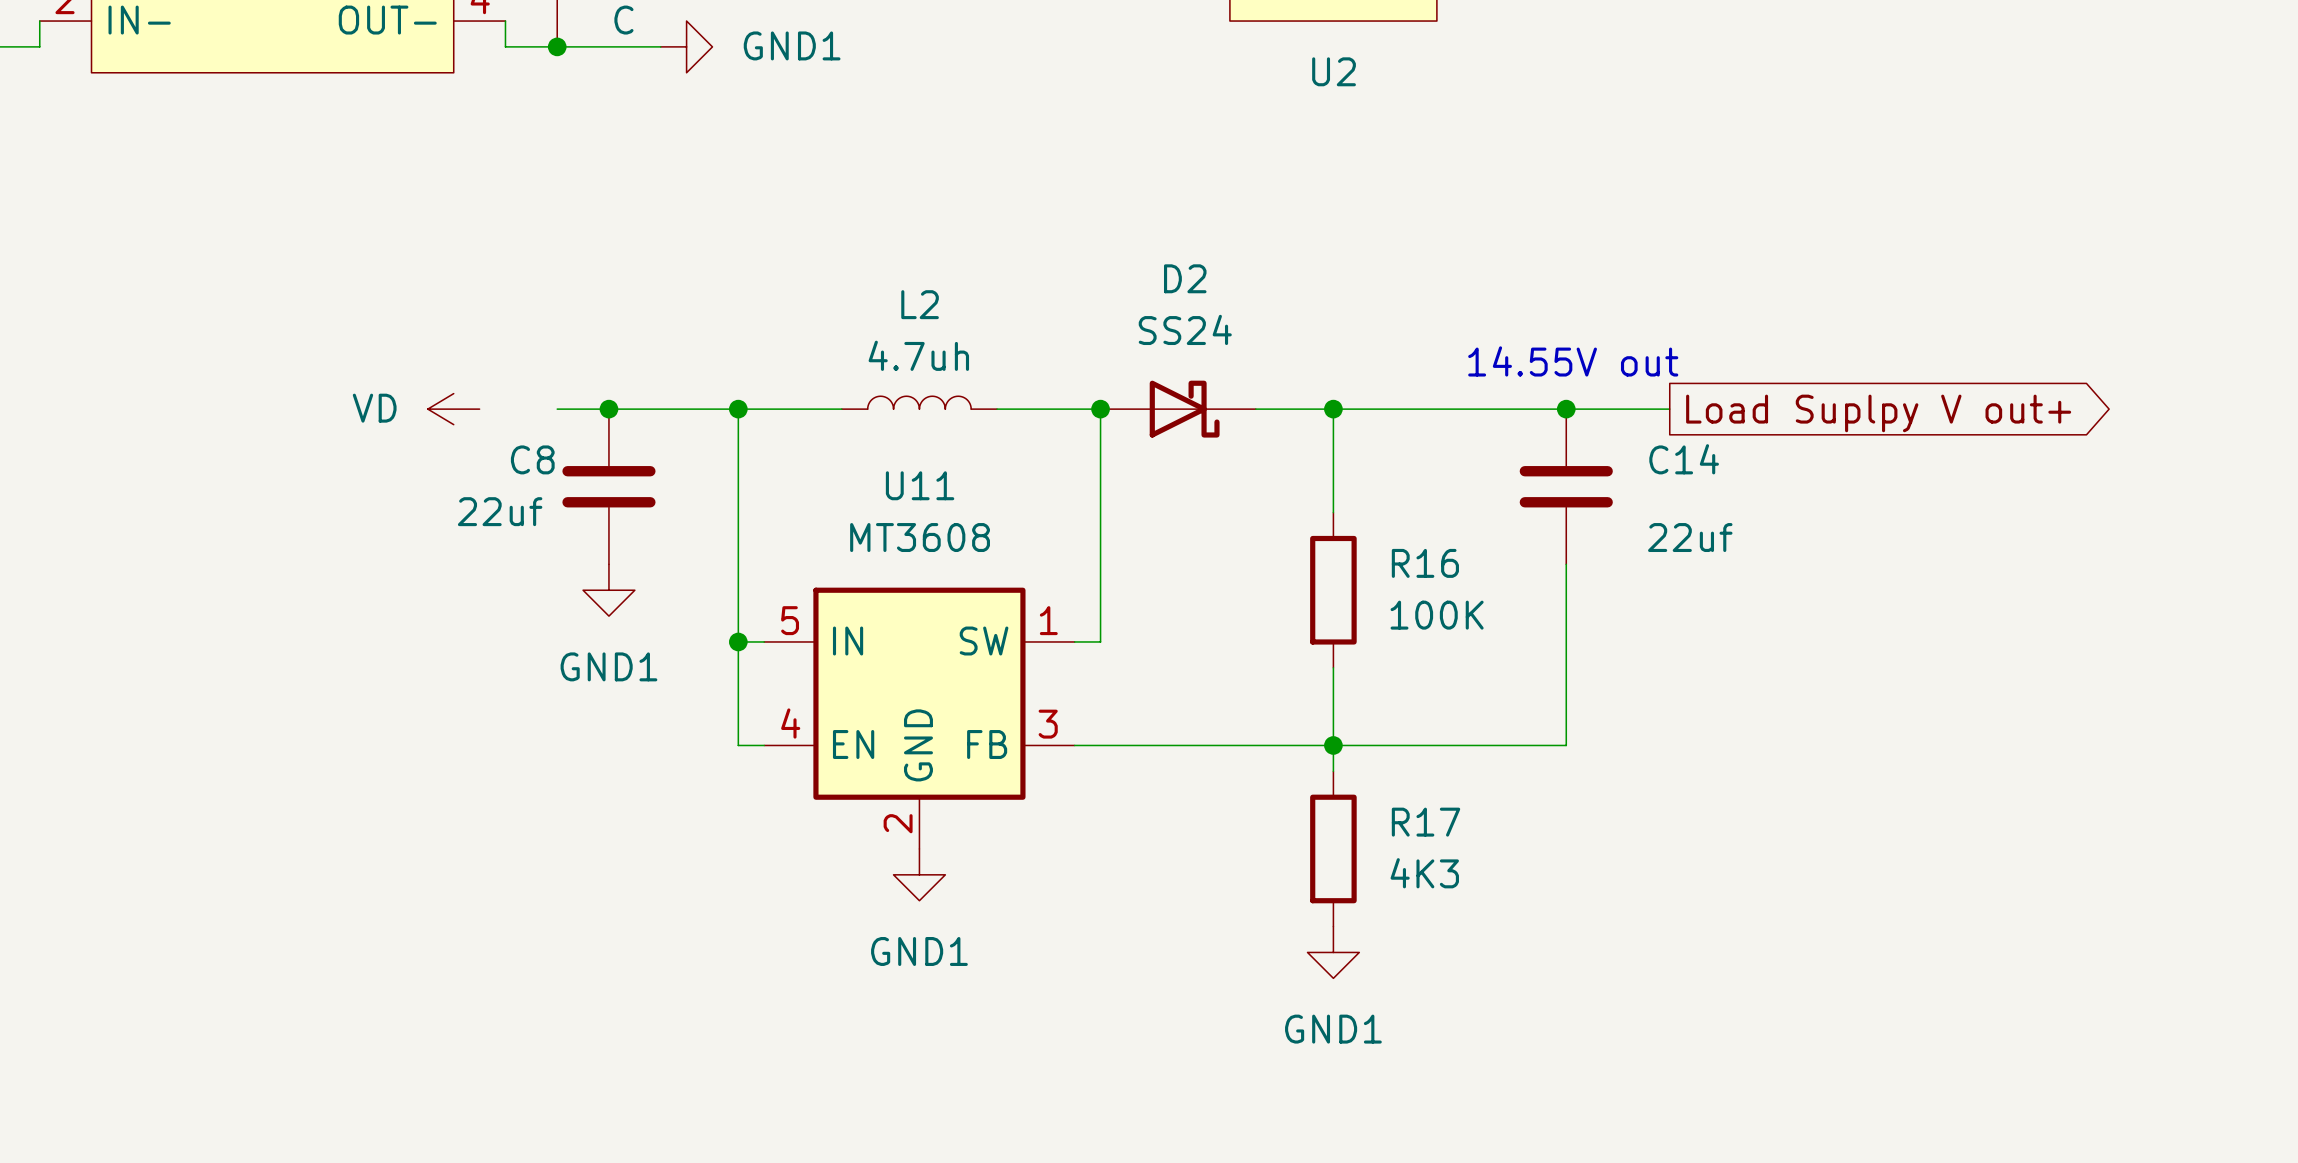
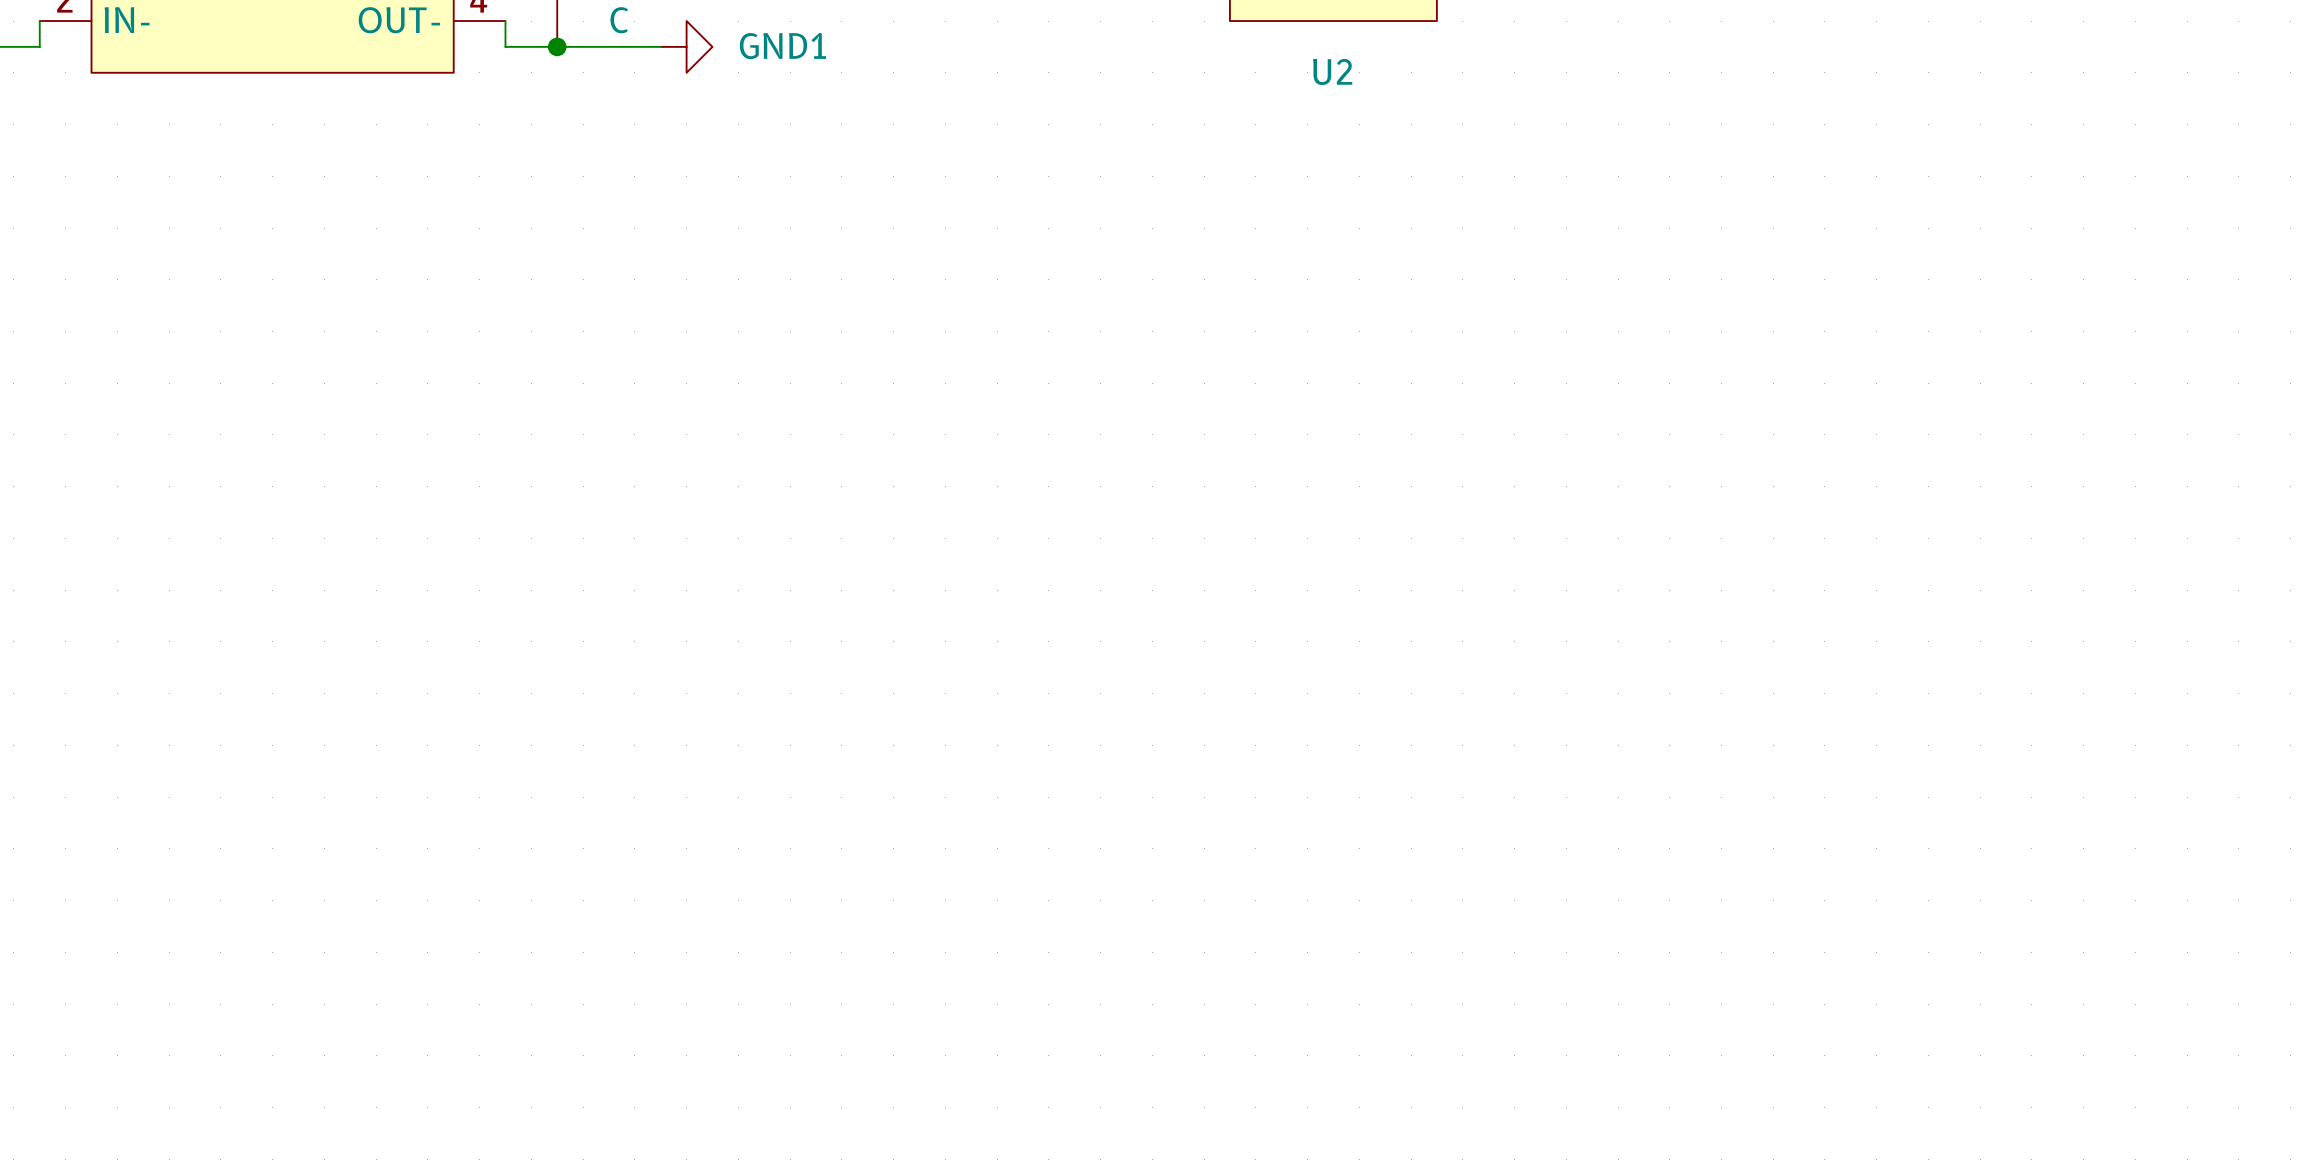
text: 14.55V out (1573, 361) -> none
L2: 4.7uh (919, 402) -> none
power symbol: VD (453, 409) -> none
wire: (557, 409) (841, 409) -> none
junction: (608, 409) -> none
wire: (738, 409) (738, 745) (764, 745) -> none
junction: (738, 409) -> none
wire: (997, 409) (1100, 409) (1100, 641) (1074, 641) -> none
junction: (1100, 409) -> none
D2: SS24 (1178, 409) -> none
wire: (1255, 409) (1669, 409) -> none
wire: (1333, 409) (1333, 512) -> none
junction: (1333, 409) -> none
junction: (1566, 409) -> none
global label: Load Suplpy V out+ (1878, 413) -> none
C8: 22uf (608, 486) -> none
C14: 22uf (1566, 486) -> none
wire: (1566, 564) (1566, 745) (1074, 745) -> none
power symbol: GND1 (608, 590) -> none
R16: 100K (1333, 590) -> none
wire: (738, 641) (764, 641) -> none
junction: (738, 641) -> none
wire: (1333, 667) (1333, 771) -> none
U11: MT3608 (919, 718) -> none
junction: (1333, 745) -> none
R17: 4K3 (1333, 848) -> none
power symbol: GND1 (919, 874) -> none
power symbol: GND1 (1333, 952) -> none

